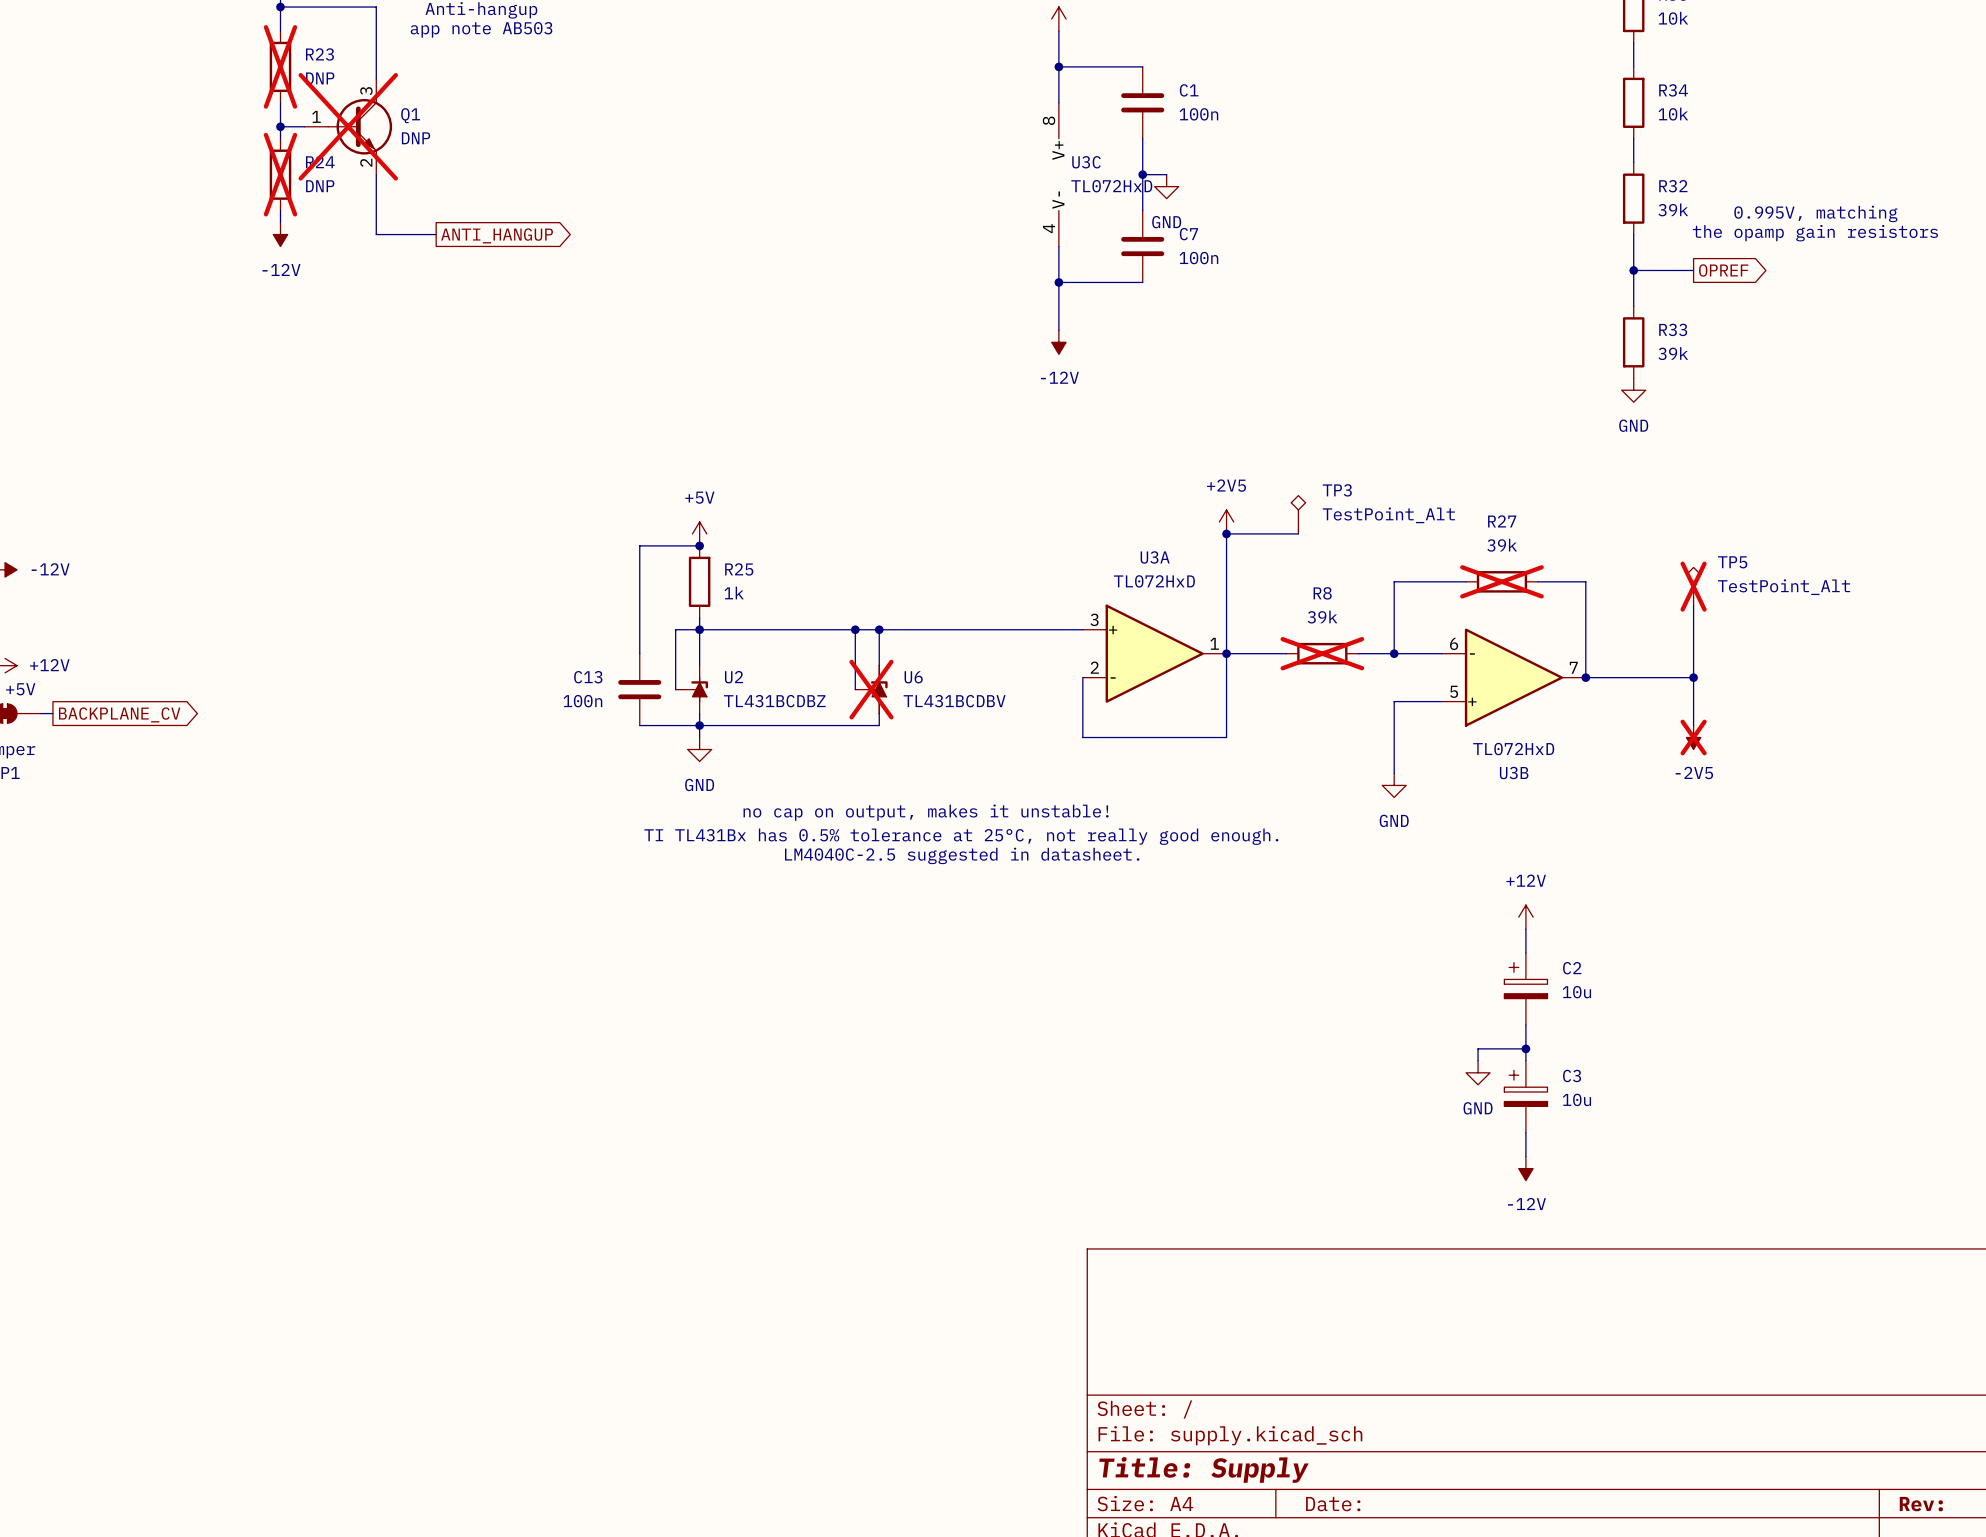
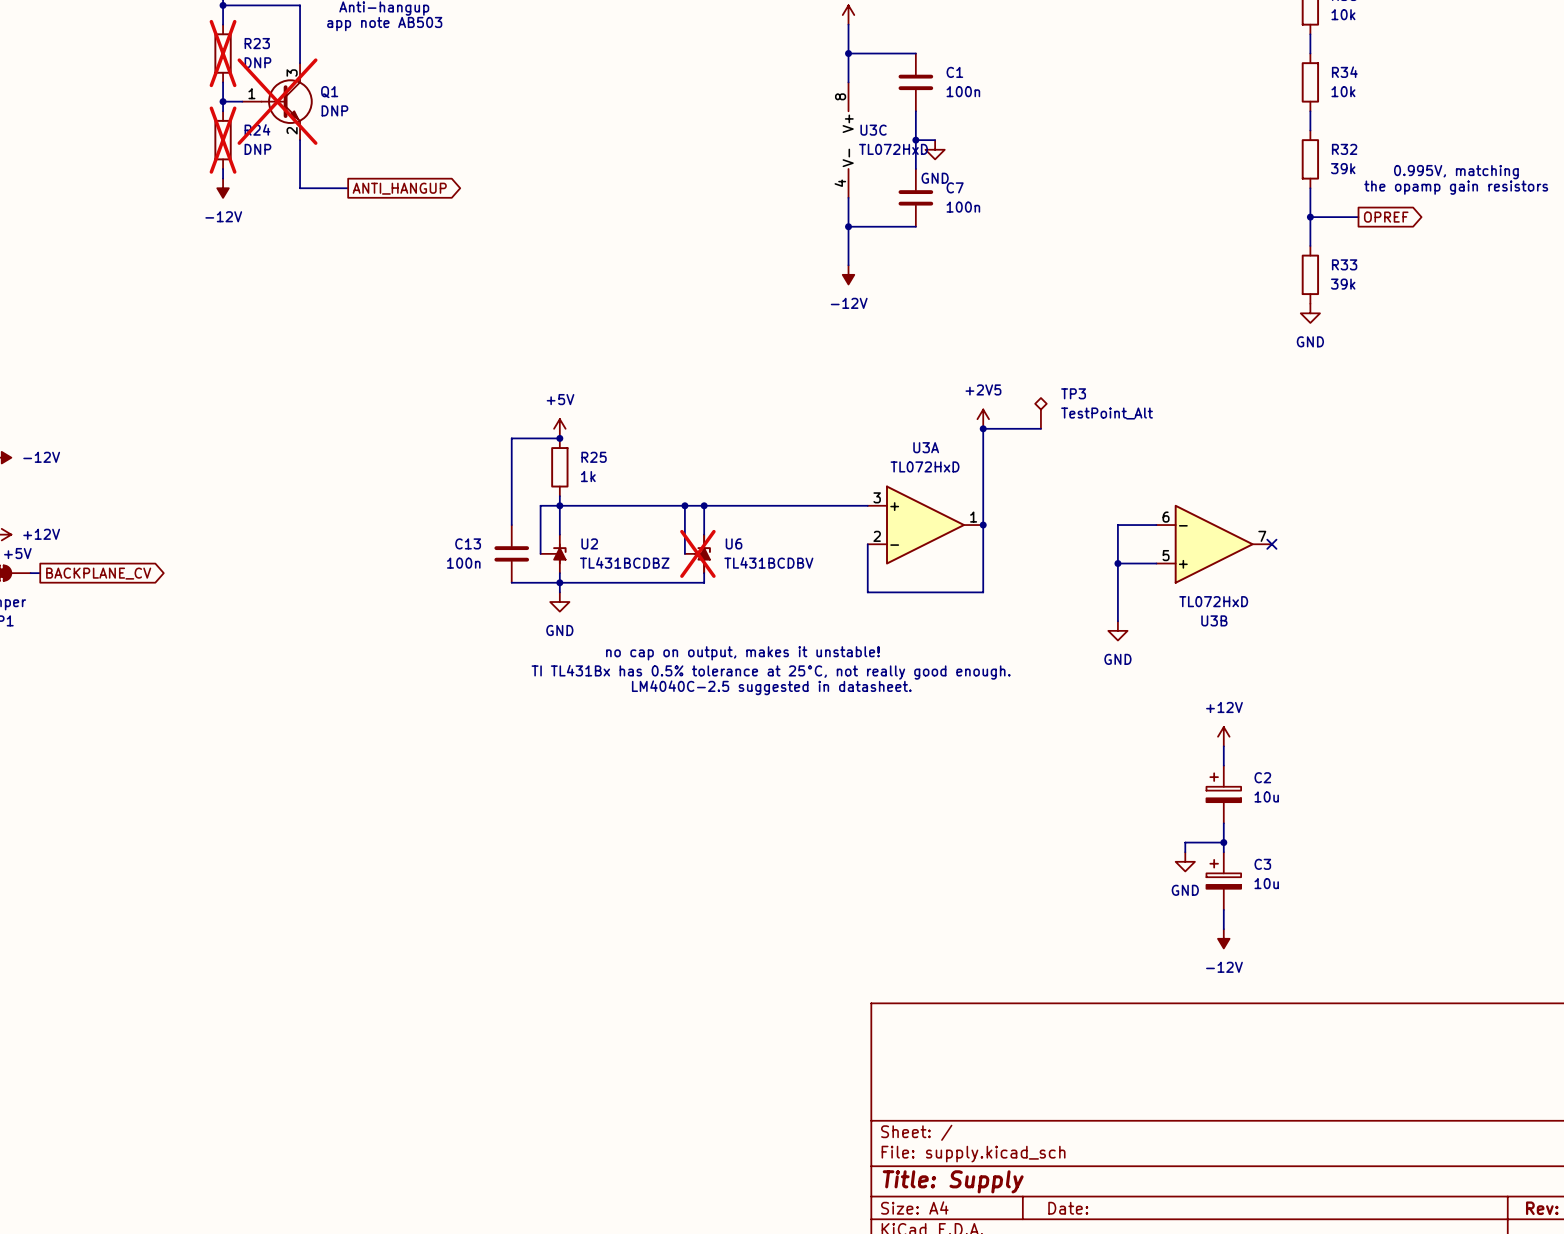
wire: (1466, 581) (1394, 581) (1394, 653) (1358, 653) -> none
R27: 39k (1501, 581) -> none
wire: (1537, 581) (1585, 581) (1585, 677) (1693, 677) -> none
TP5: TestPoint_Alt (1693, 586) -> none
wire: (1693, 605) (1693, 725) -> none
wire: (1226, 653) (1286, 653) -> none
R8: 39k (1322, 653) -> none
wire: none -> (1117, 525) (1117, 563)
junction position: (1394, 653) -> (1117, 563)
junction: (1585, 677) -> none
no-connect mark: none -> (1271, 544)
junction: (1693, 677) -> none
power symbol: -2V5 (1693, 737) -> none

